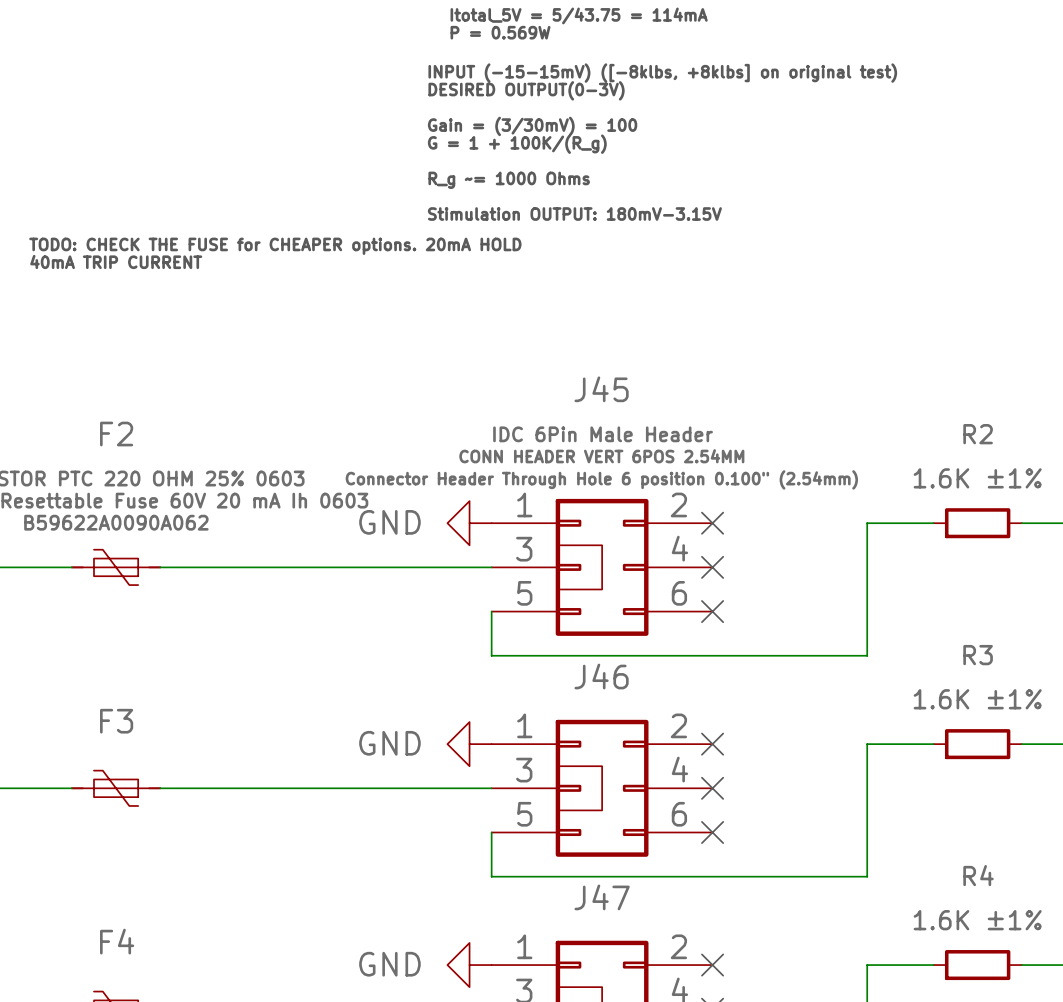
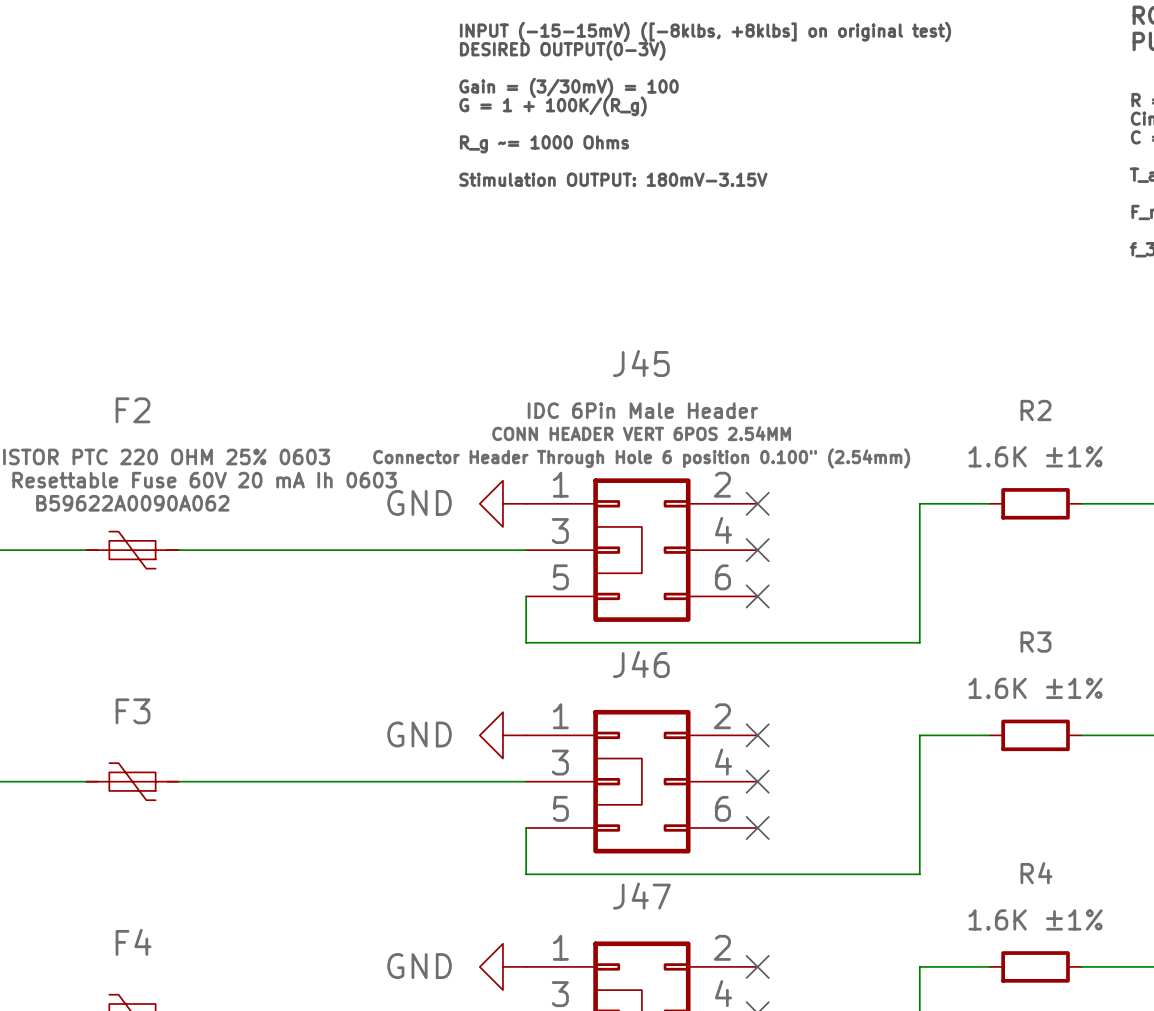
text: TODO: CHECK THE FUSE for CHEAPER options. 20mA HOLD (275, 246) -> none
text: 40mA TRIP CURRENT (116, 261) -> none

